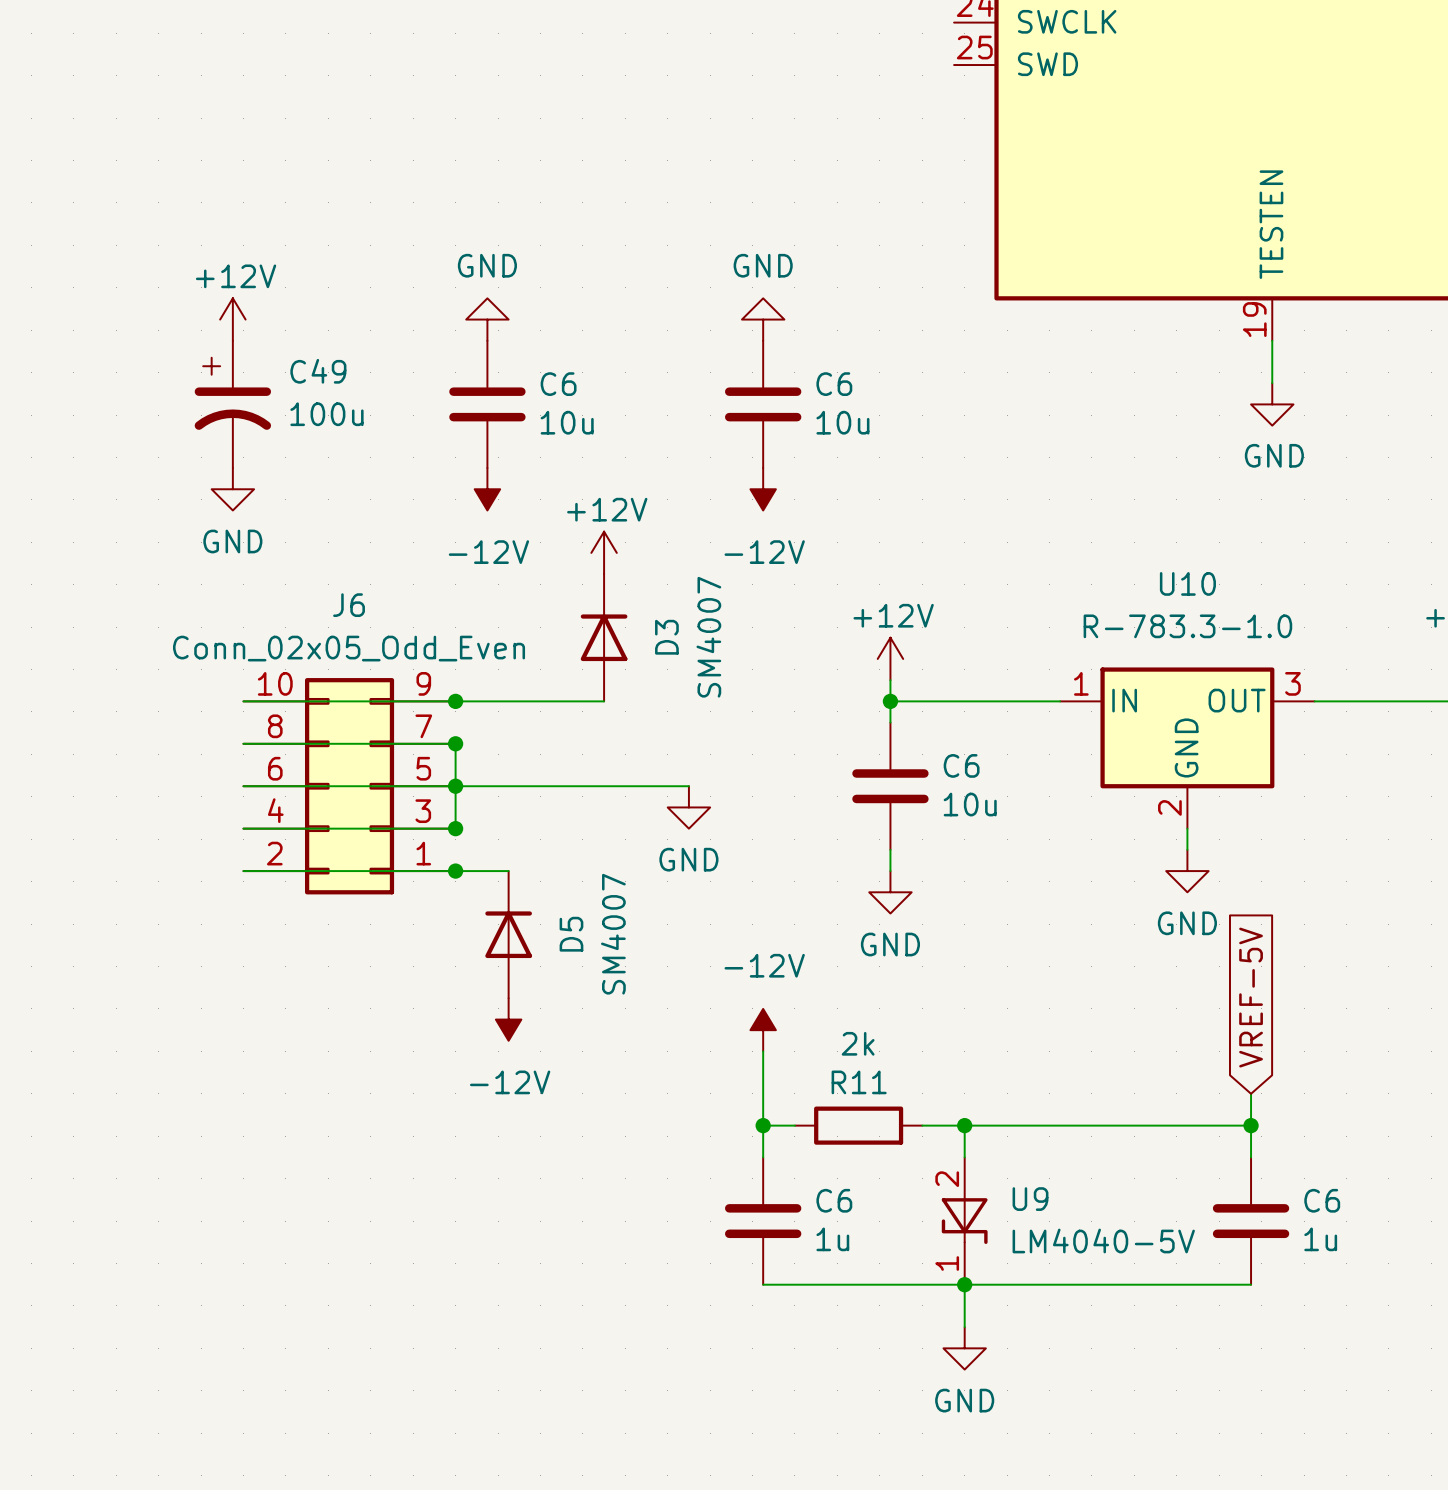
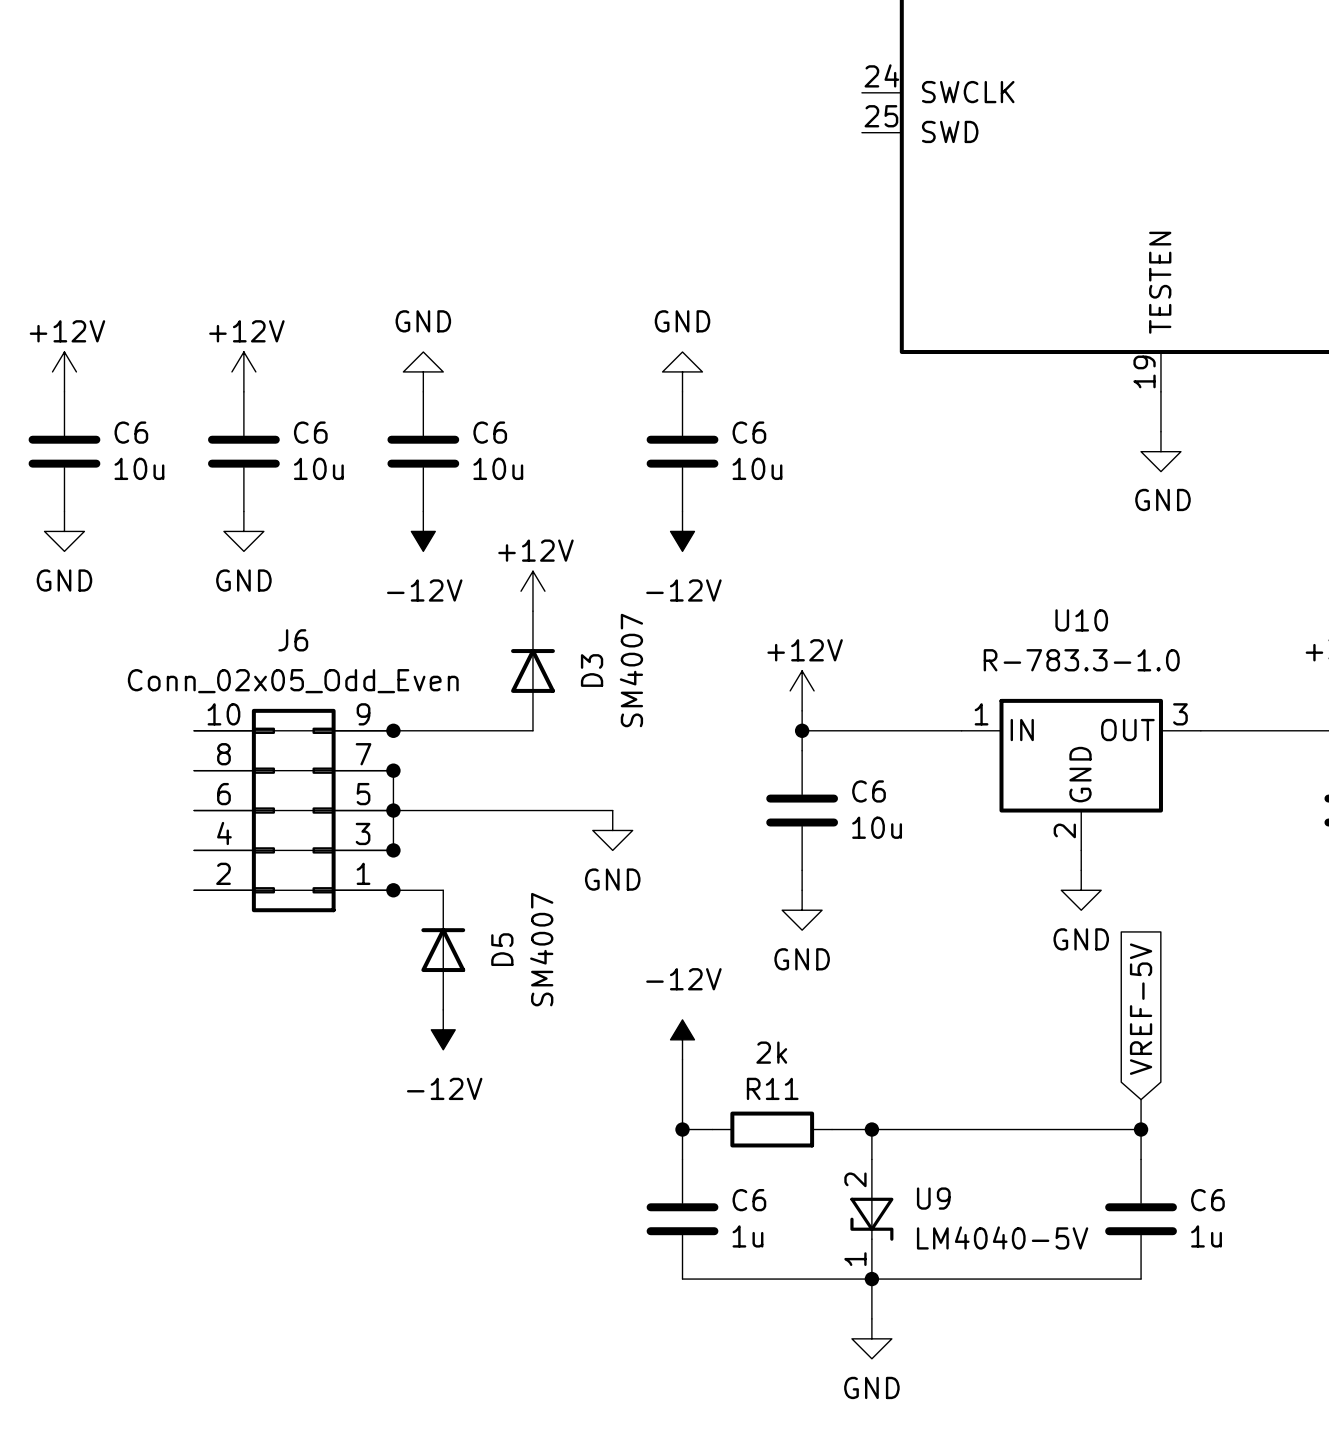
power symbol: none -> +12V (64, 371)
power symbol: +12V (232, 319) -> none
power symbol: none -> +12V (243, 371)
C6: none -> 10u (64, 451)
C49: 100u (232, 404) -> none
C6: none -> 10u (243, 451)
power symbol: none -> GND (64, 531)
power symbol: GND (232, 489) -> none
power symbol: none -> GND (243, 531)

